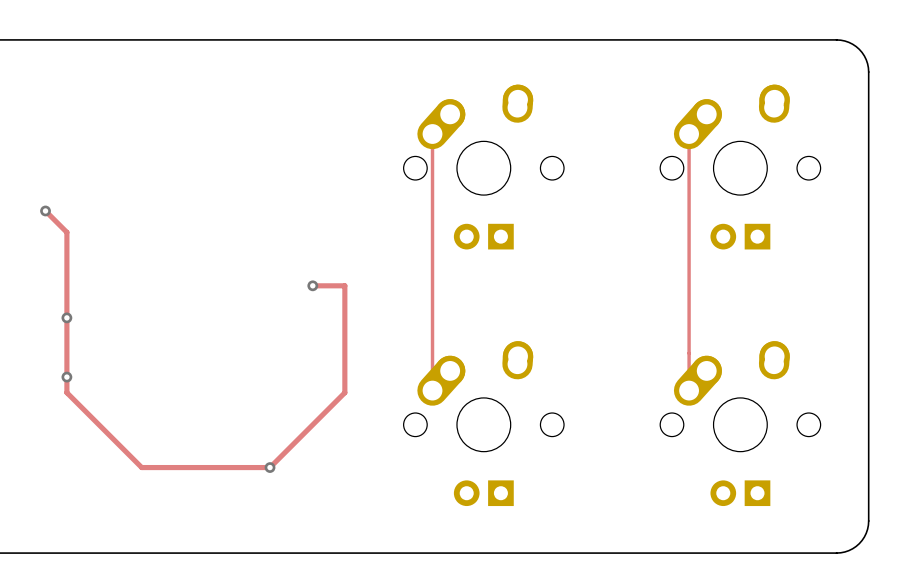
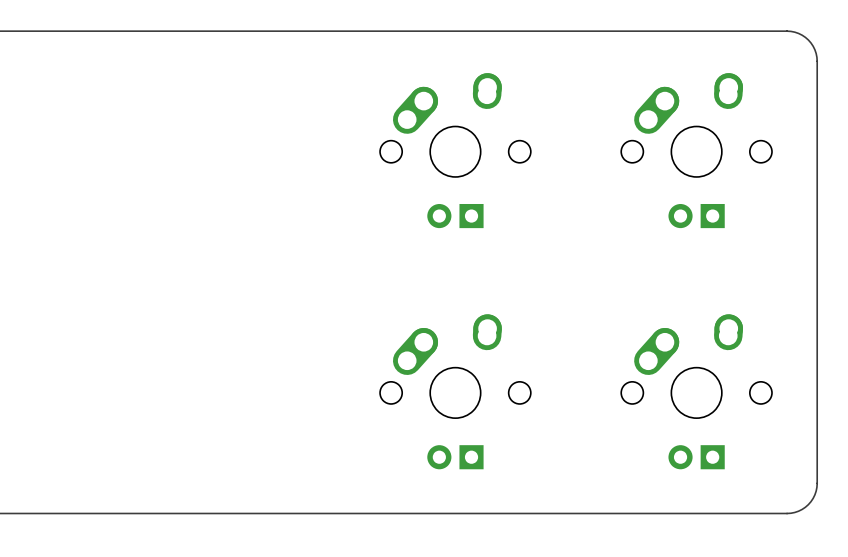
track: (432, 134) (432, 390) -> none
track: (689, 134) (689, 390) -> none
track: (45, 210) (66, 232) (66, 392) (141, 467) (270, 467) (344, 392) (344, 285) (312, 285) -> none
via: (45, 210) -> none
via: (312, 285) -> none
via: (66, 317) -> none
via: (66, 377) -> none
via: (270, 467) -> none

